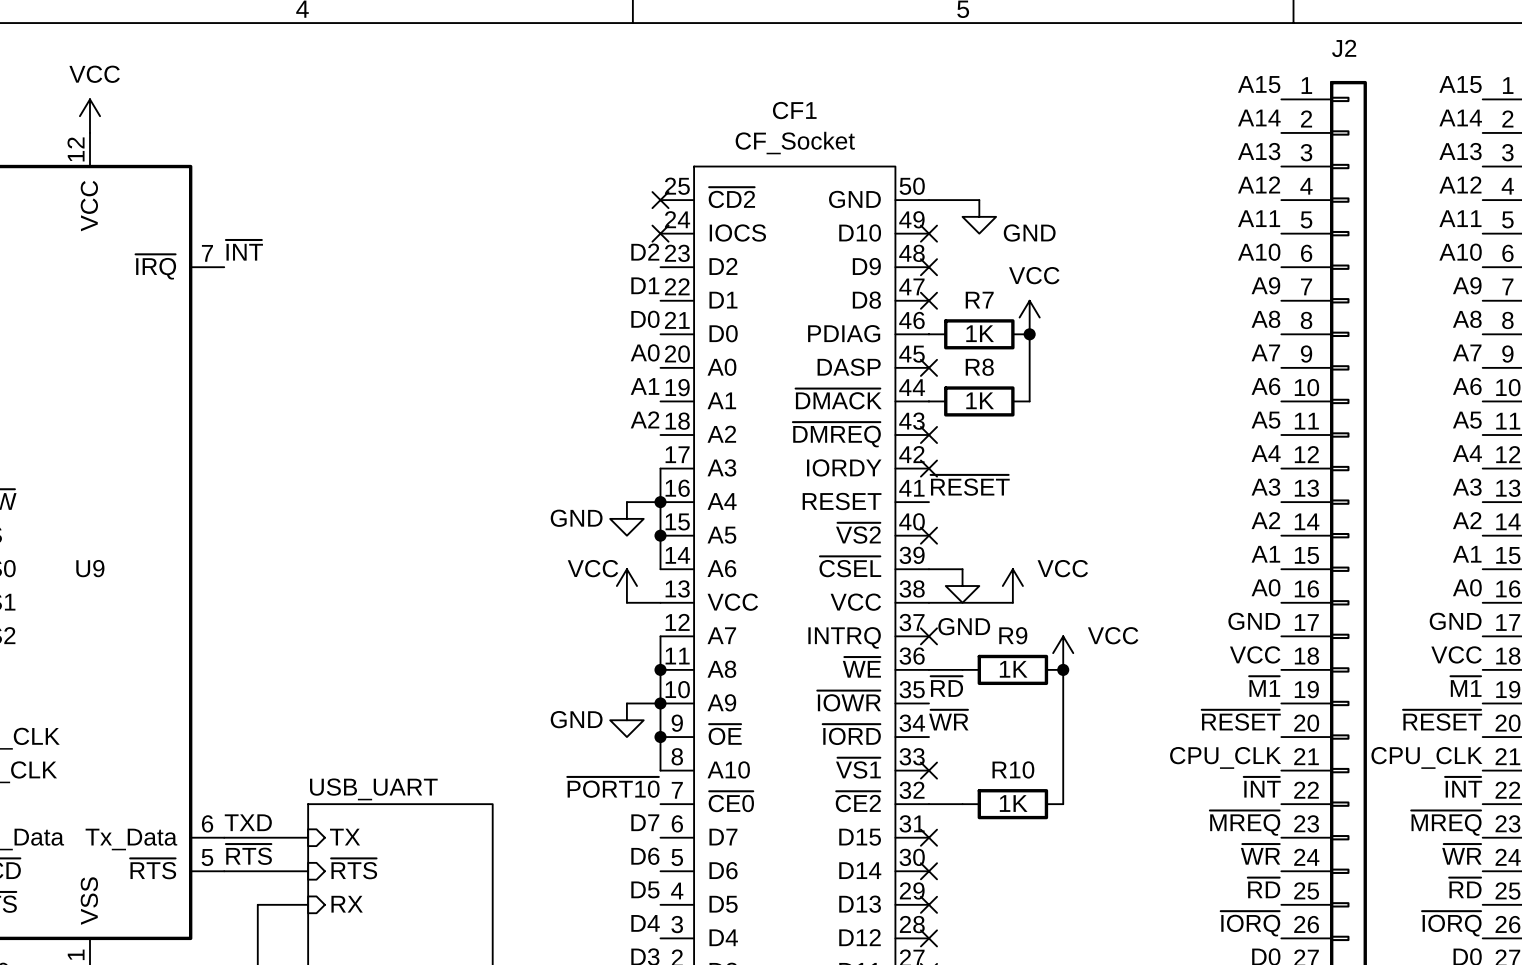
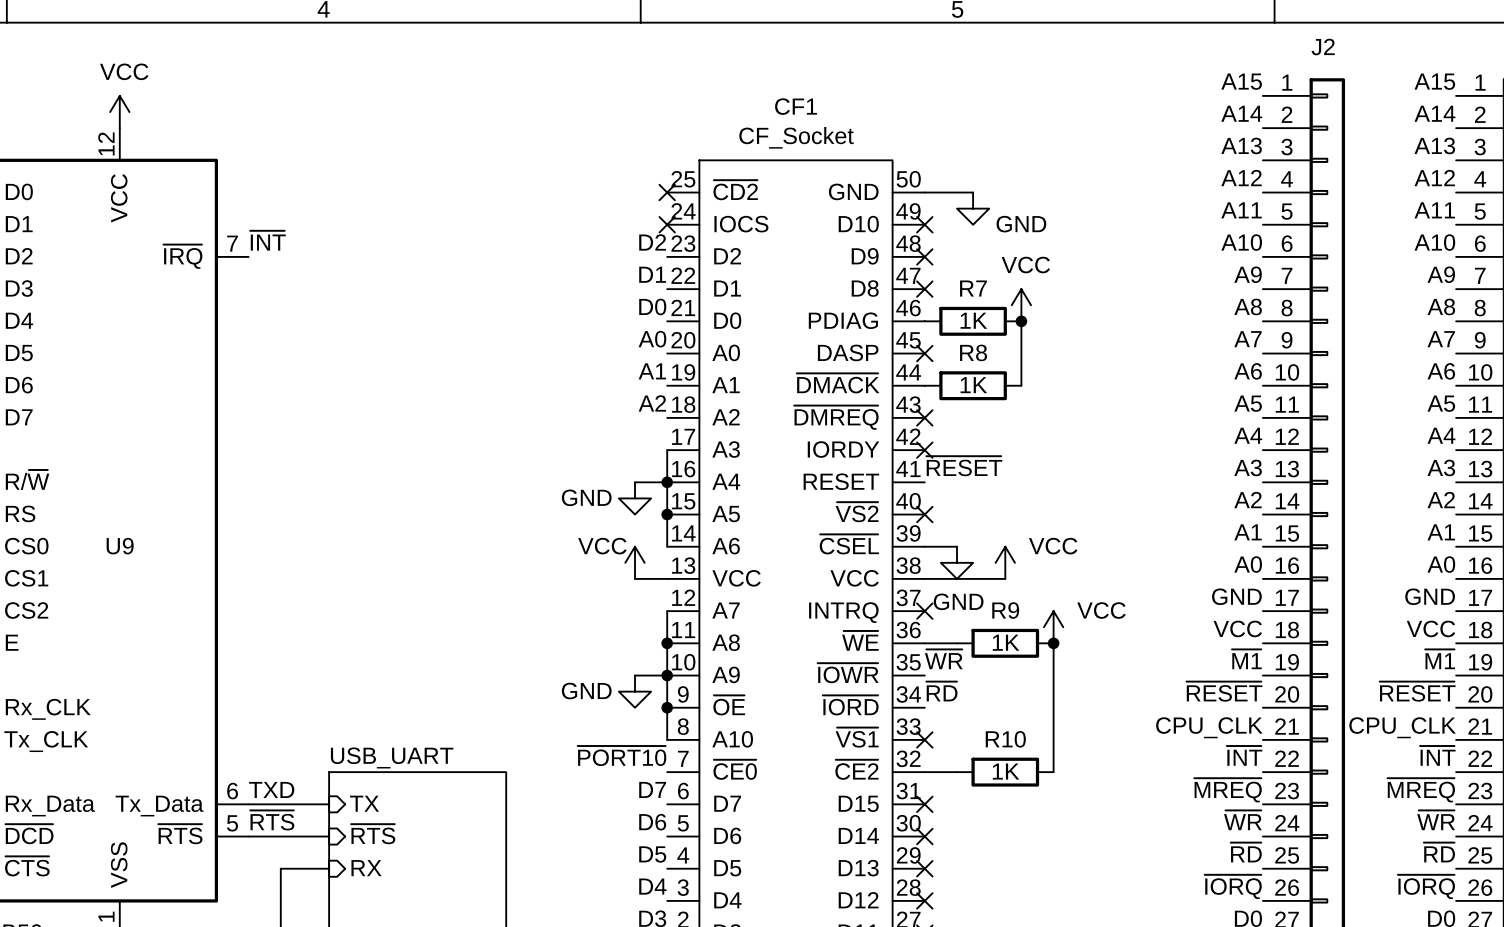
label: ~{RD} (946, 686) -> ~{WR} (943, 659)
label: ~{WR} (948, 720) -> ~{RD} (941, 691)

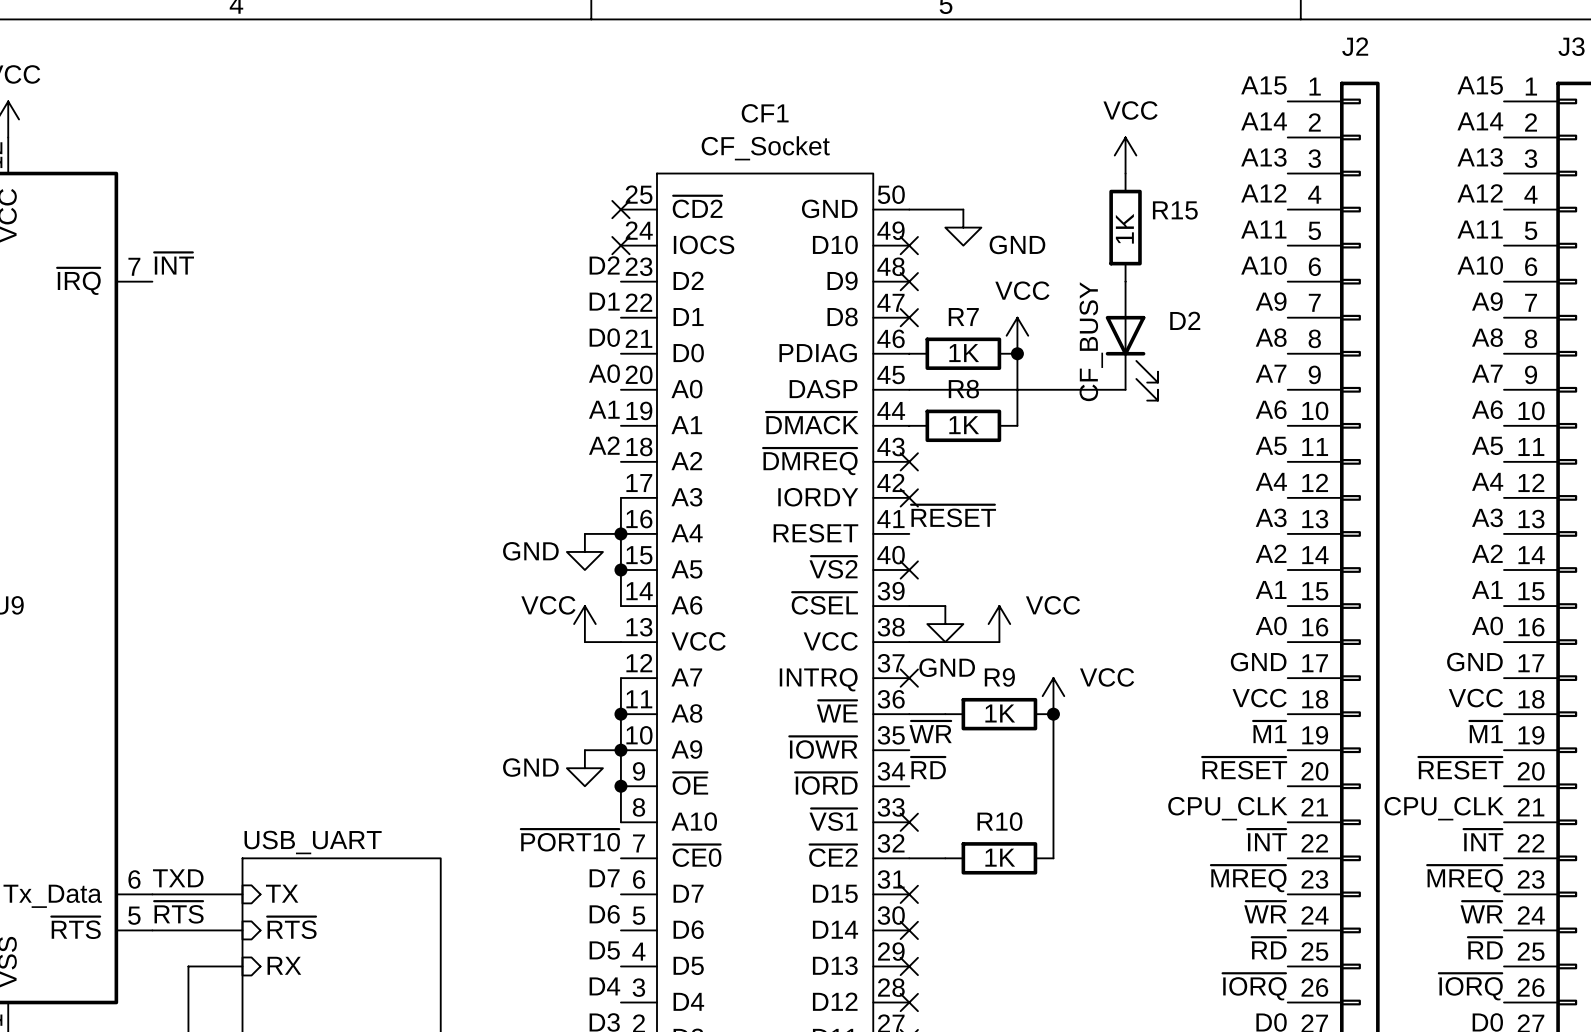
power symbol: none -> VCC (1125, 155)
R15: none -> 1K (1125, 227)
D2: none -> CF_BUSY (1131, 341)
wire: none -> (909, 389) (1125, 389)
no-connect mark: (924, 353) -> none

